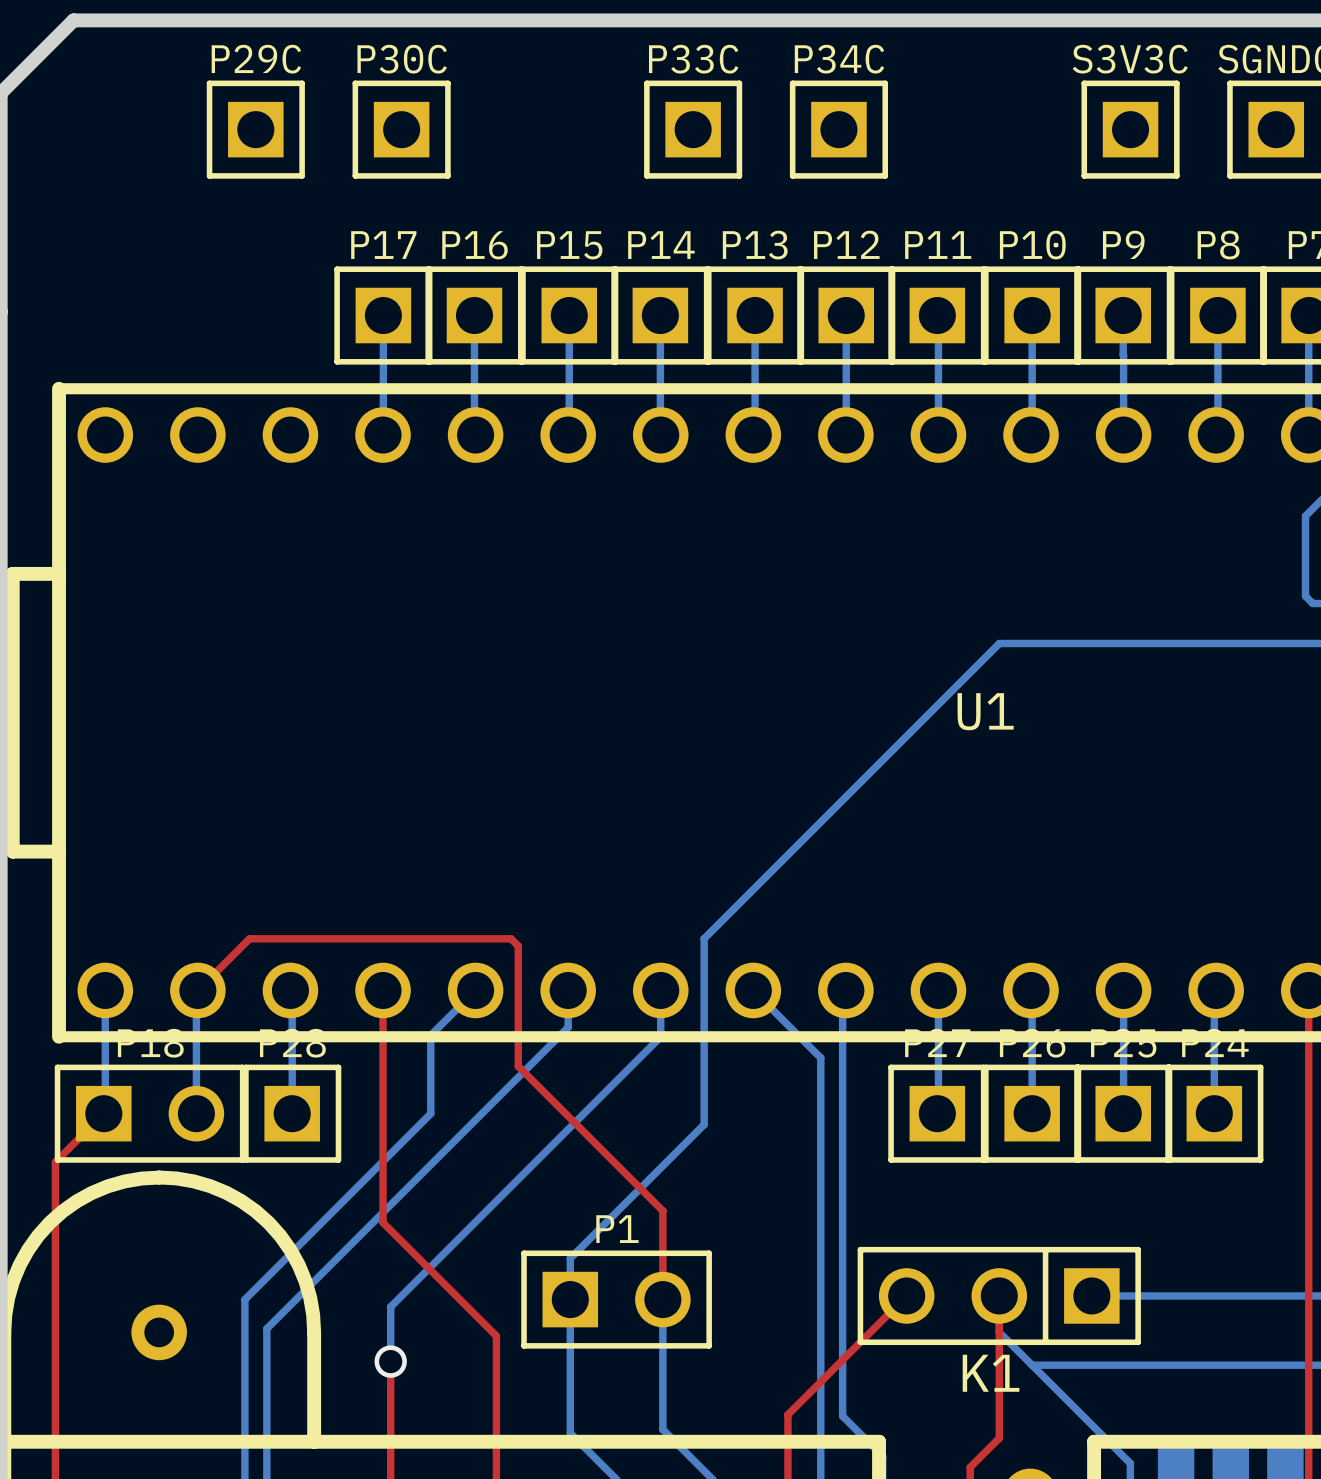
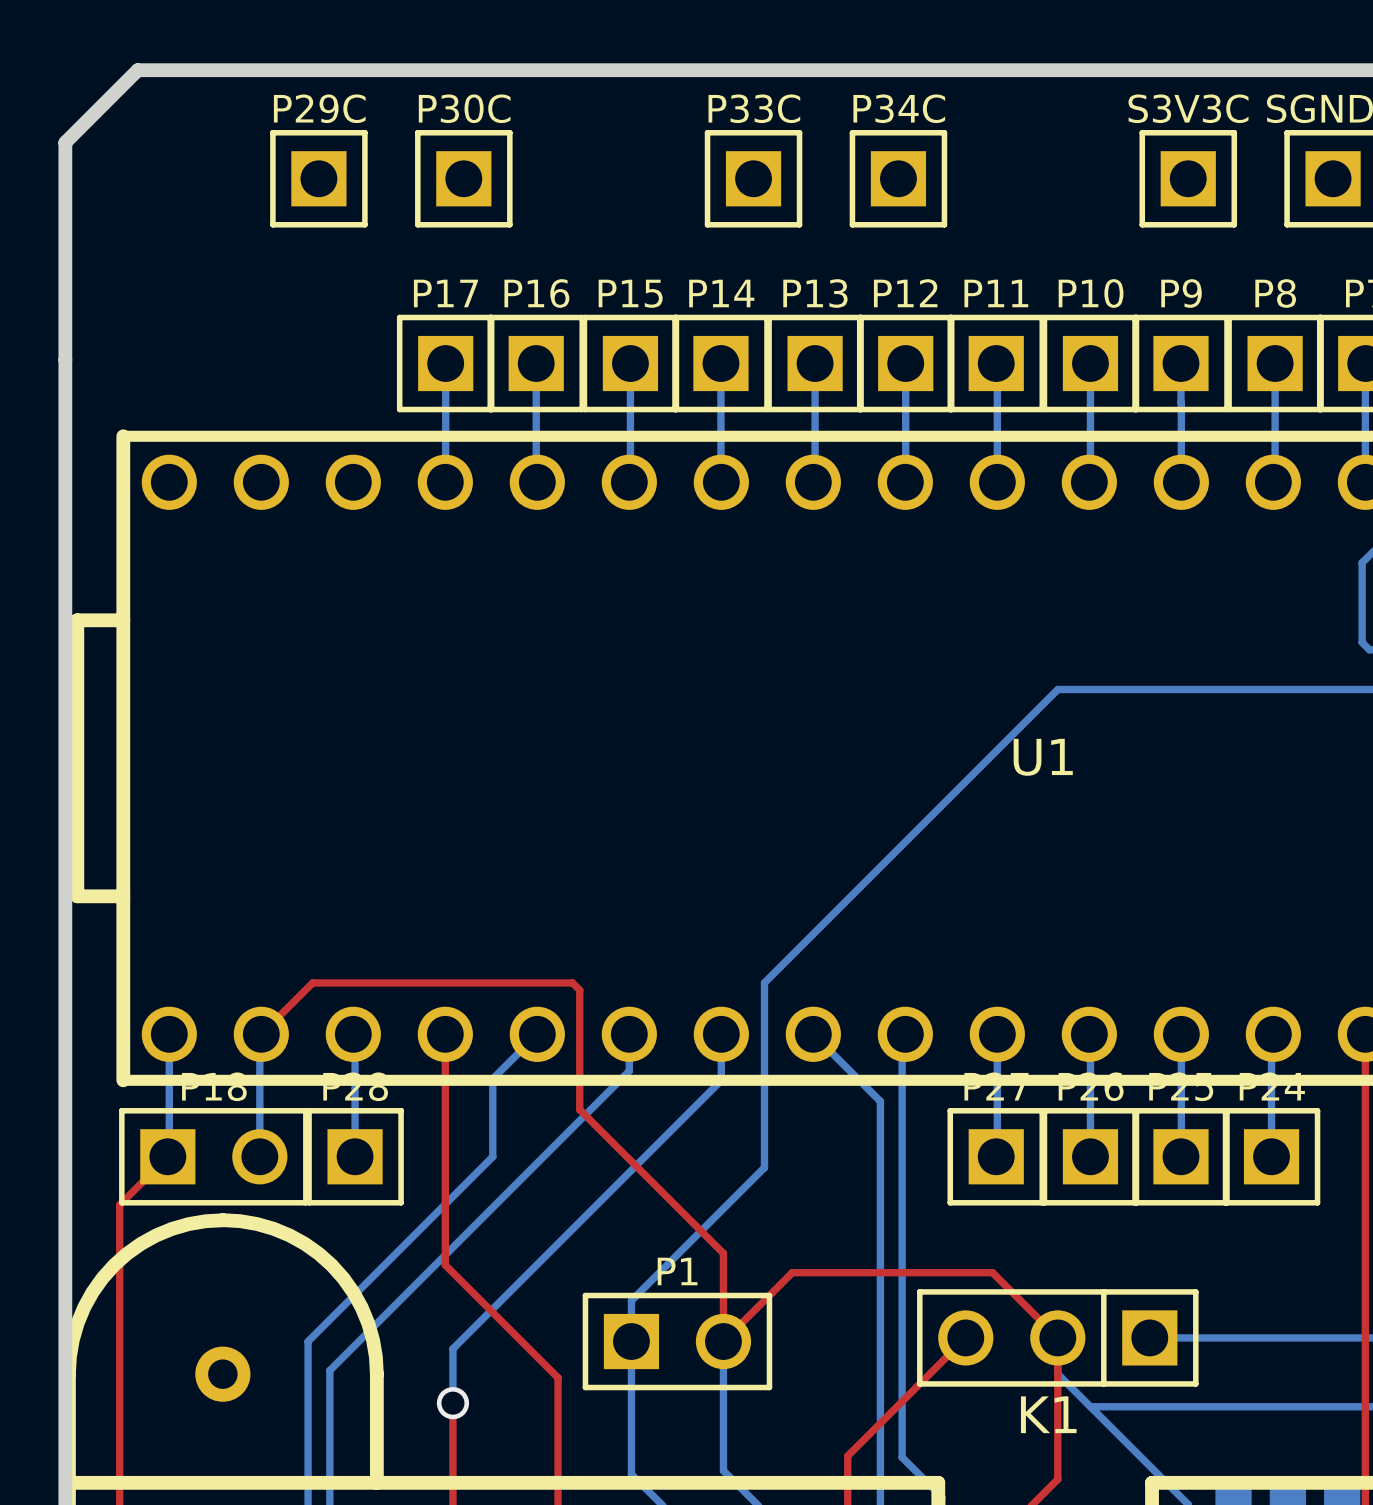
top track: none -> (1057, 1337) (992, 1272) (792, 1272) (723, 1341)

